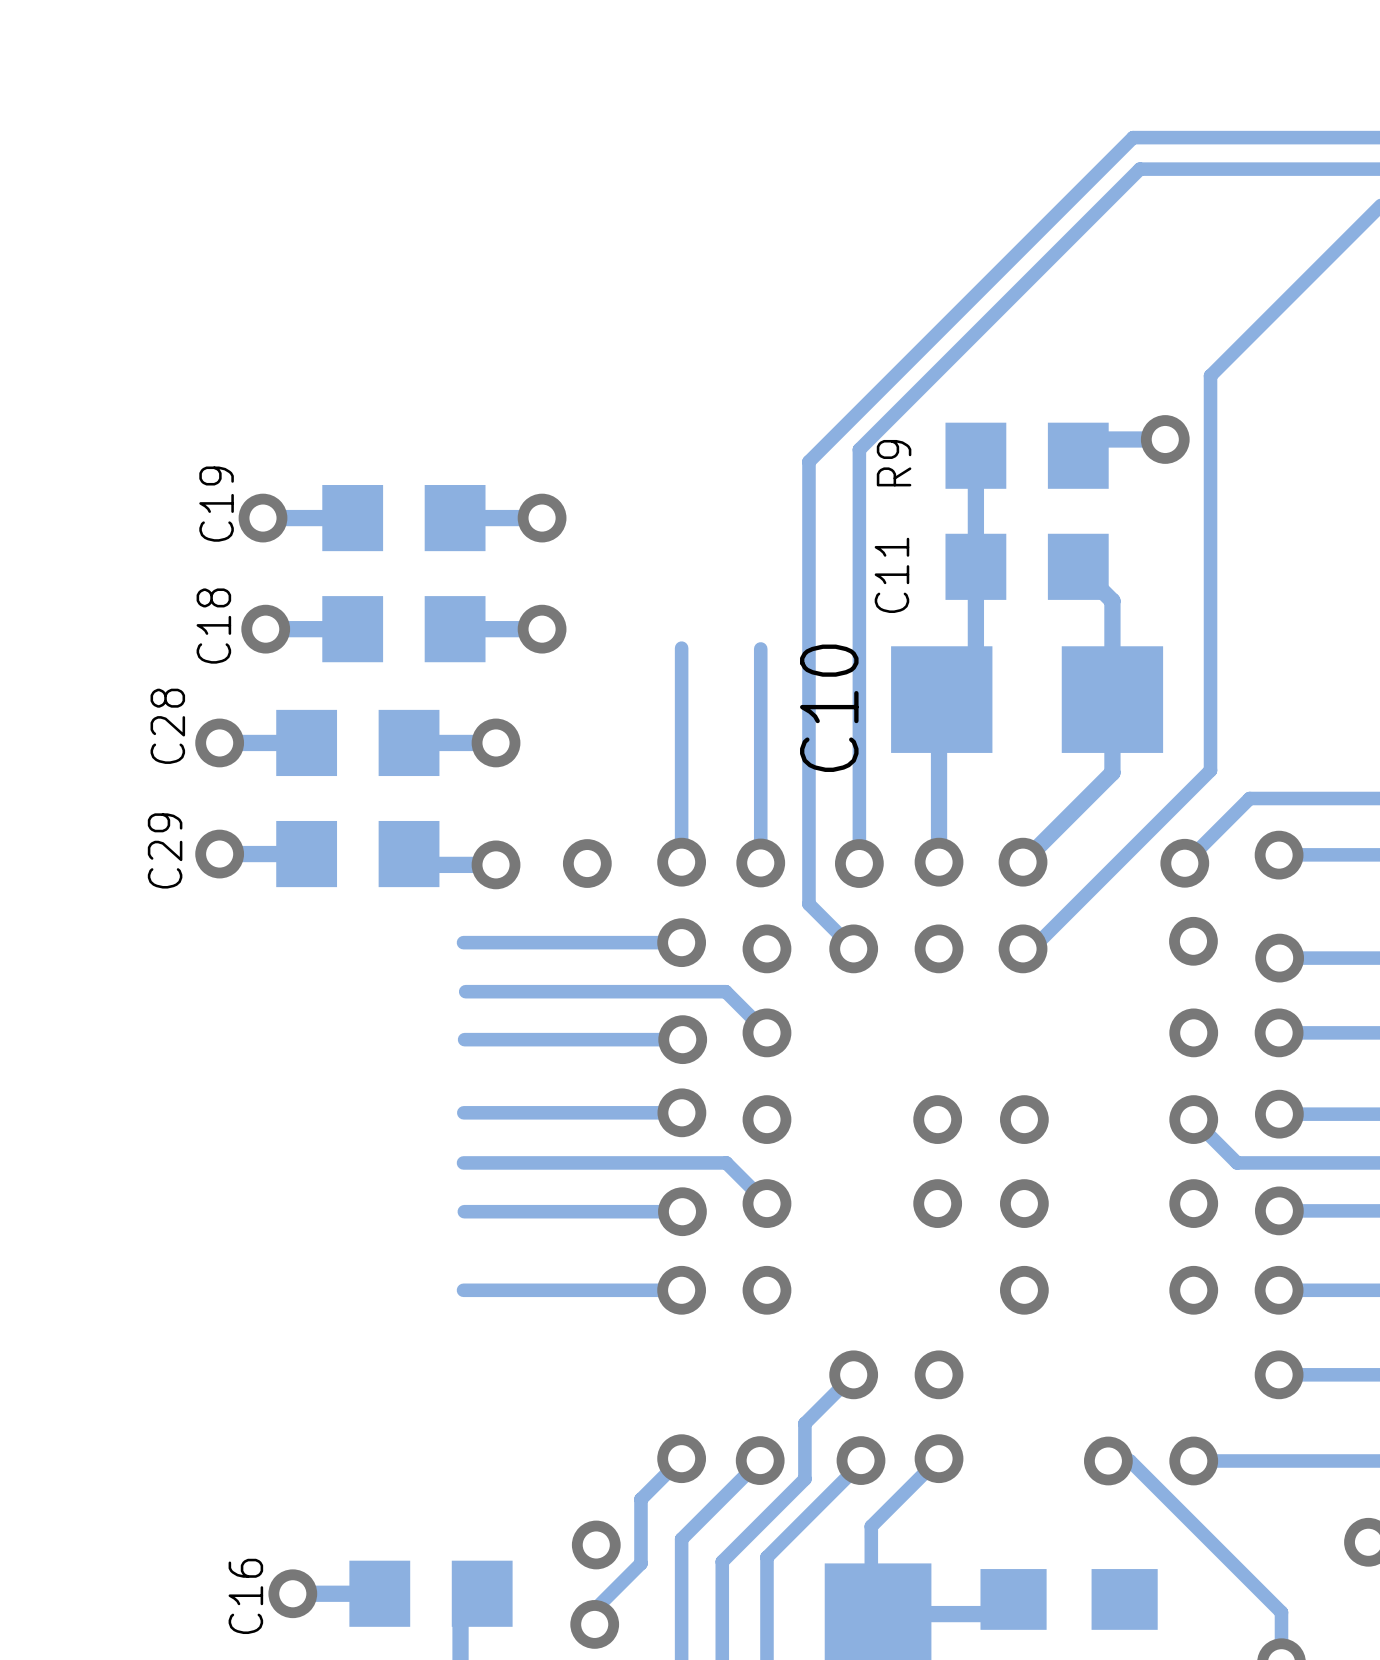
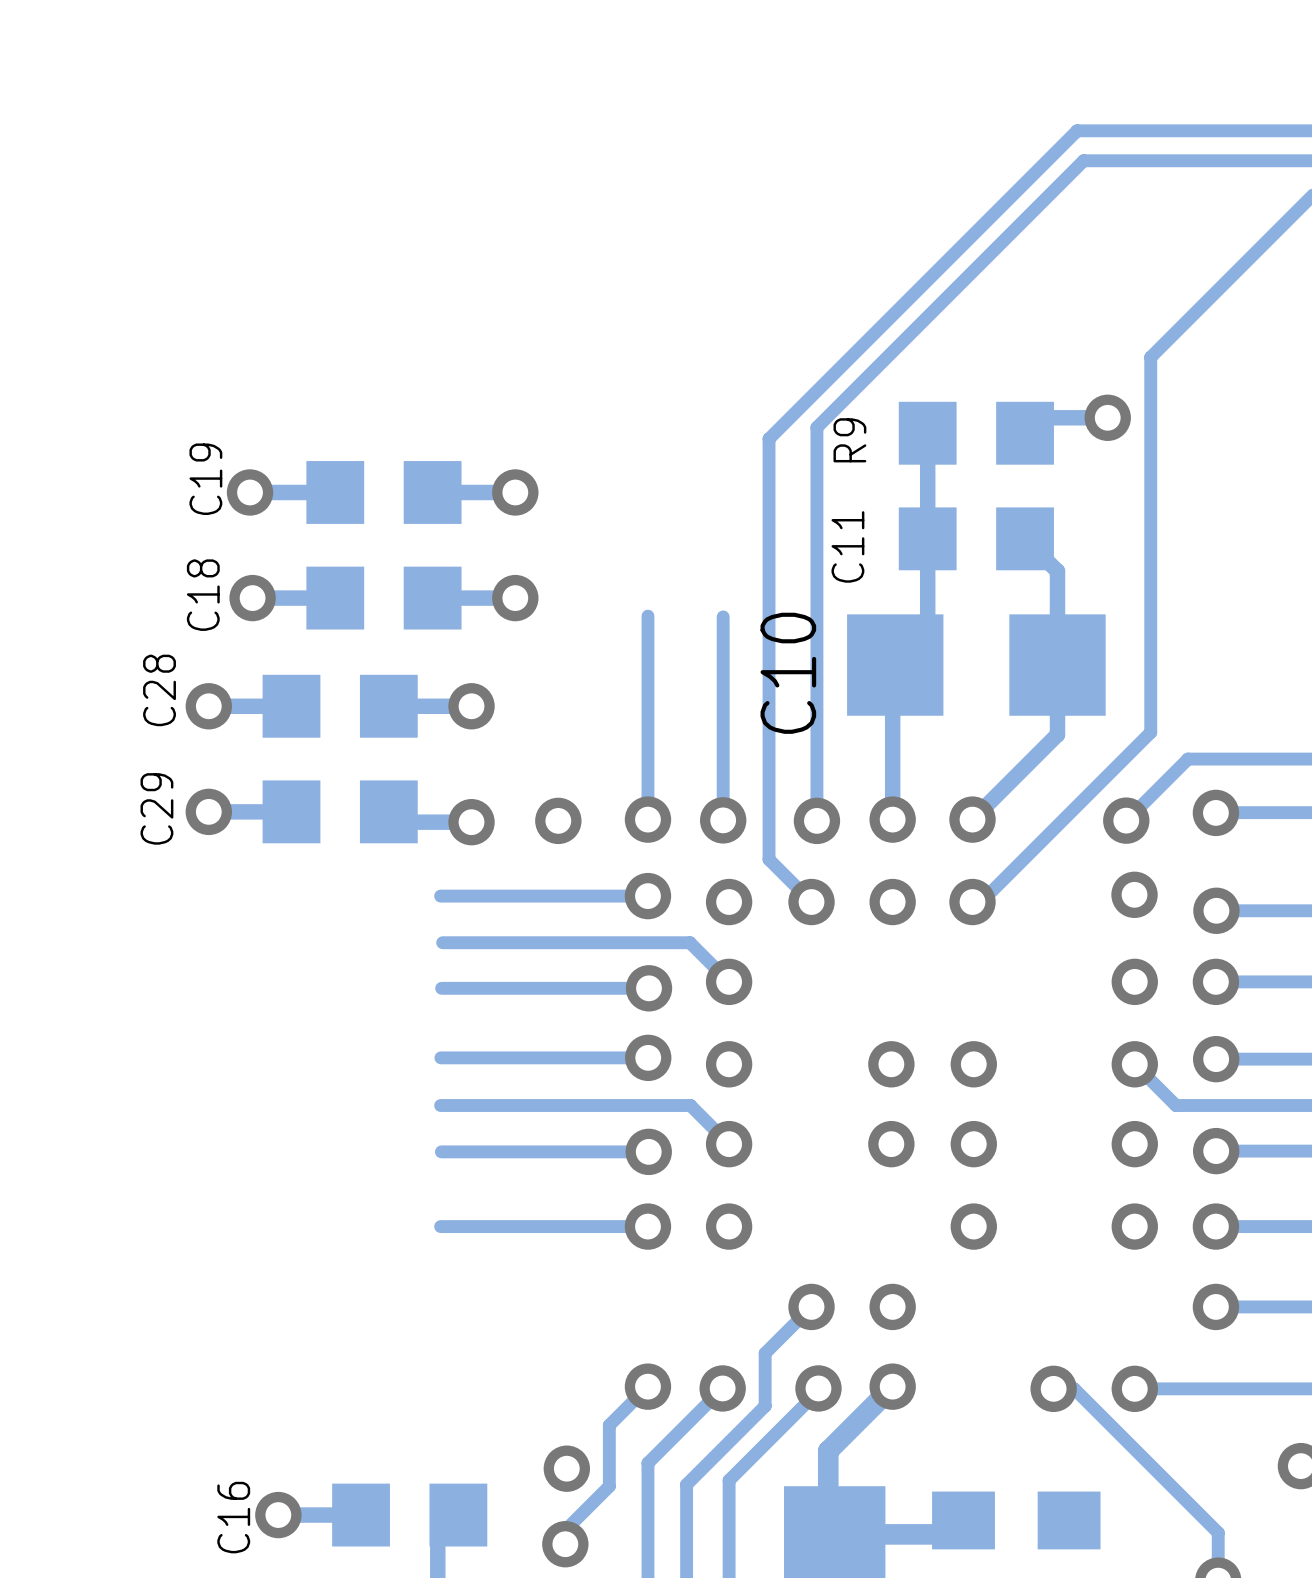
track width: thin (939, 1458) (871, 1526) (871, 1607) (878, 1614) (998, 1614) (1019, 1593) -> thick (892, 1386) (828, 1451) (828, 1527) (834, 1534) (949, 1534) (968, 1515)

